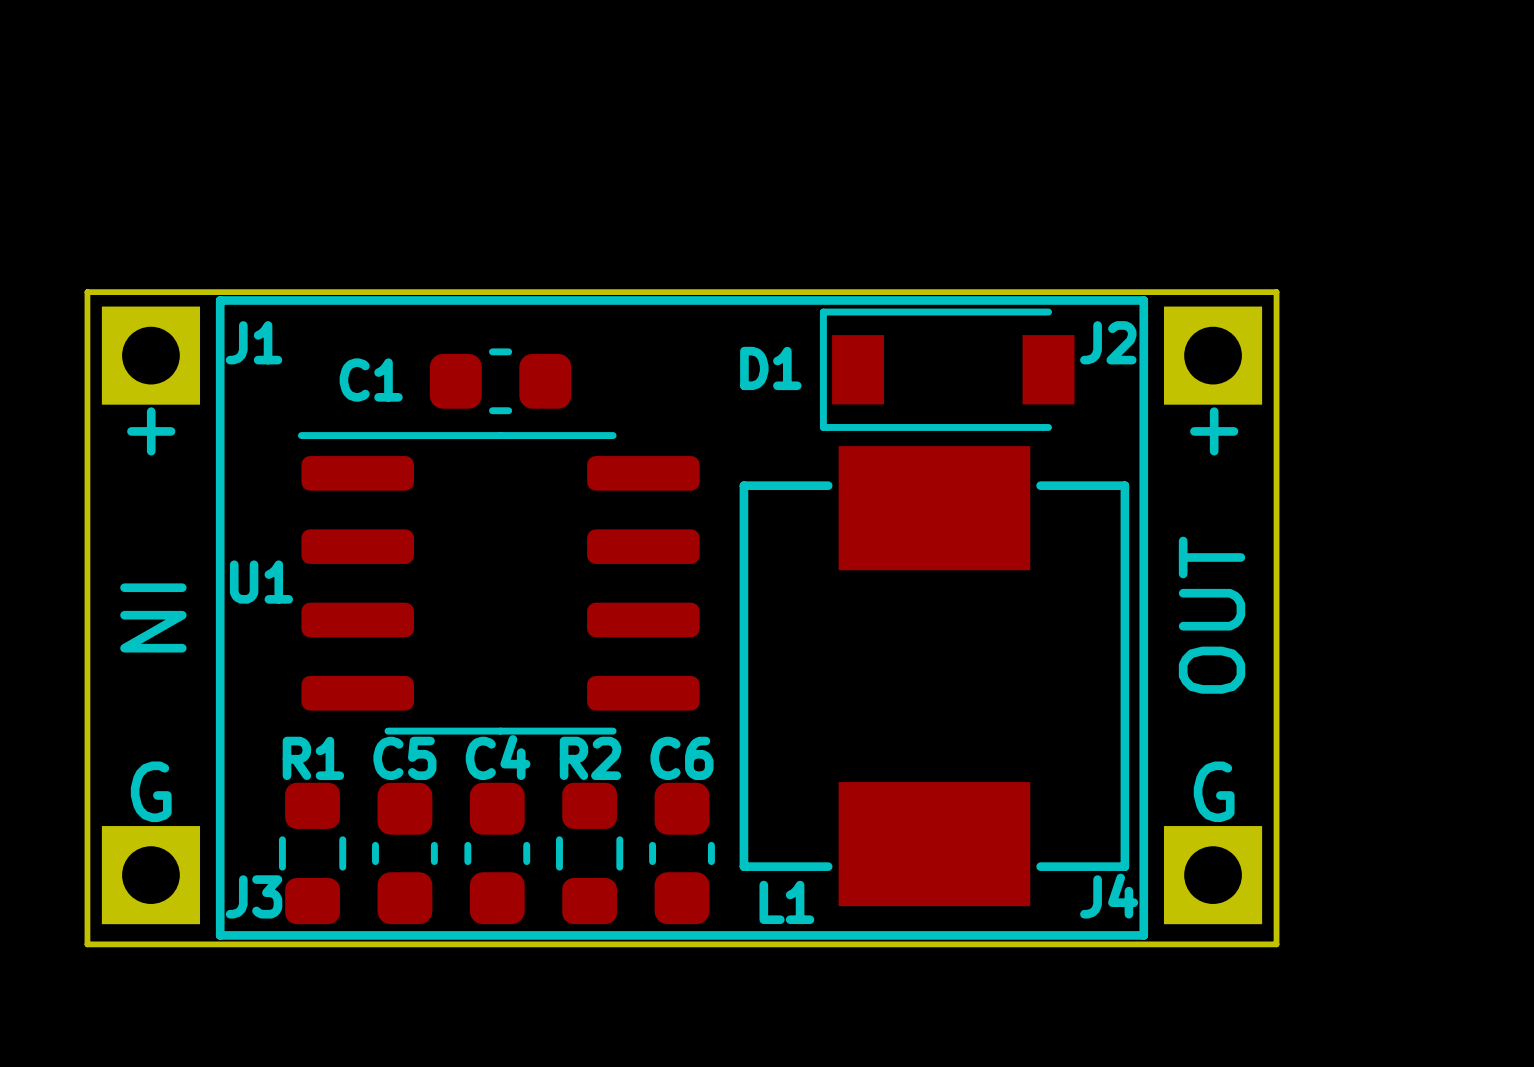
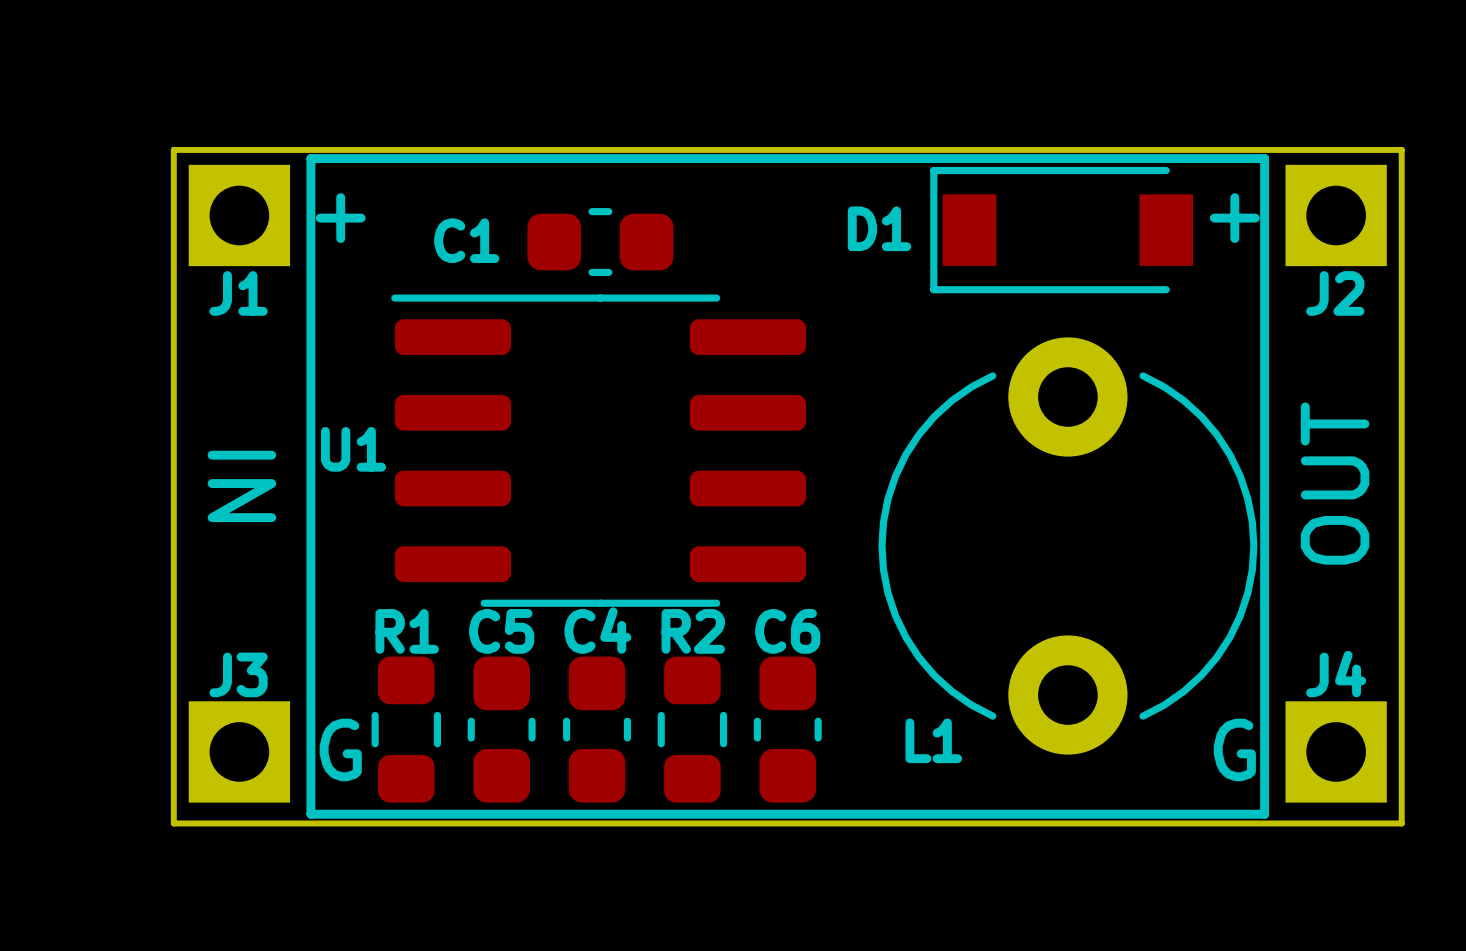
J1 name position: J1 (254, 342) -> J1 (238, 293)
J2 name position: J2 (1108, 342) -> J2 (1335, 293)
text position: + (151, 431) -> + (340, 218)
text position: + (1214, 431) -> + (1234, 218)
L1 footprint: [739, 446, 1130, 907] -> [878, 337, 1258, 755]
text position: G (151, 791) -> G (340, 749)
text position: G (1214, 791) -> G (1234, 749)
J3 name position: J3 (254, 896) -> J3 (238, 674)
J4 name position: J4 (1109, 896) -> J4 (1336, 674)

